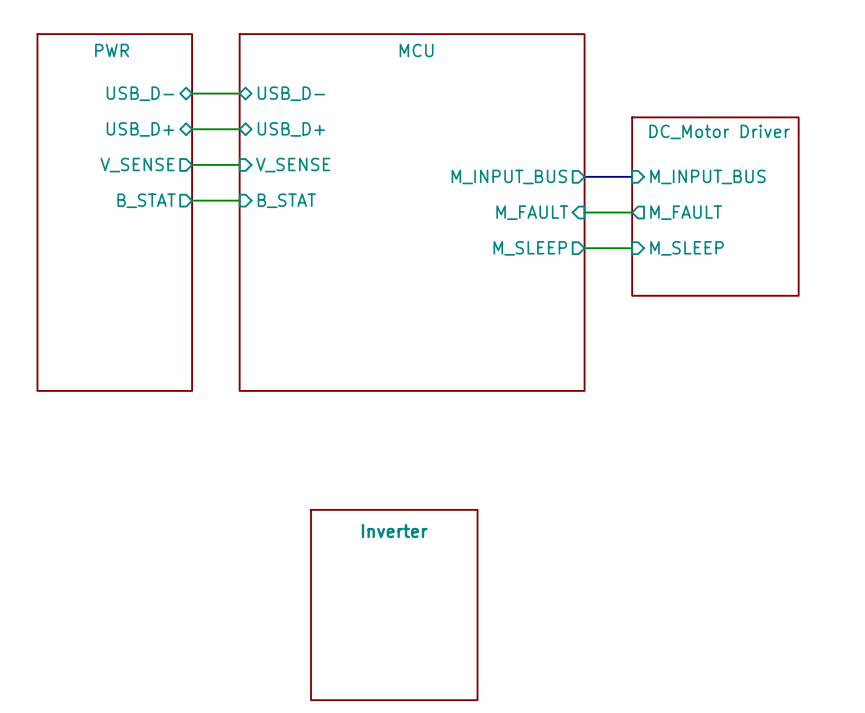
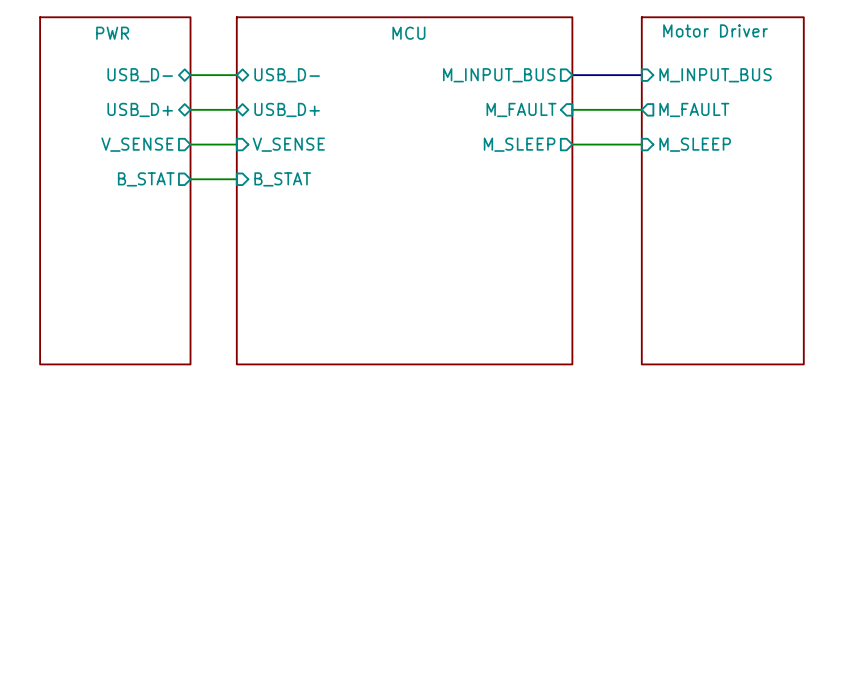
sheet pin: none -> M_INPUT_BUS (499, 75)
bus: none -> (572, 75) (641, 75)
sheet pin: none -> M_INPUT_BUS (715, 75)
sheet pin: none -> M_FAULT (521, 109)
wire: none -> (572, 109) (641, 109)
sheet pin: none -> M_FAULT (694, 109)
wire: none -> (572, 144) (641, 144)
sheet pin: none -> M_SLEEP (519, 144)
sheet pin: none -> M_SLEEP (695, 144)
sheet pin: M_INPUT_BUS (509, 176) -> none
bus: (584, 176) (632, 176) -> none
sheet pin: M_INPUT_BUS (707, 176) -> none
sheet DC_Motor Driver: (715, 206) -> none
sheet pin: M_FAULT (532, 212) -> none
wire: (584, 212) (632, 212) -> none
sheet pin: M_FAULT (686, 212) -> none
sheet Motor Driver: none -> (722, 190)
sheet pin: M_SLEEP (530, 248) -> none
wire: (584, 248) (632, 248) -> none
sheet pin: M_SLEEP (686, 248) -> none
sheet Inverter: (394, 605) -> none

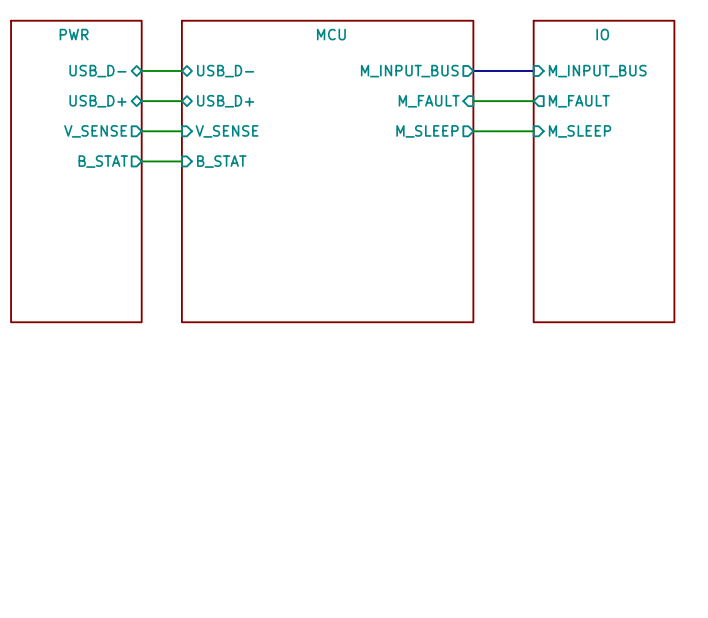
sheet Motor Driver name: Motor Driver (715, 30) -> IO (602, 34)

